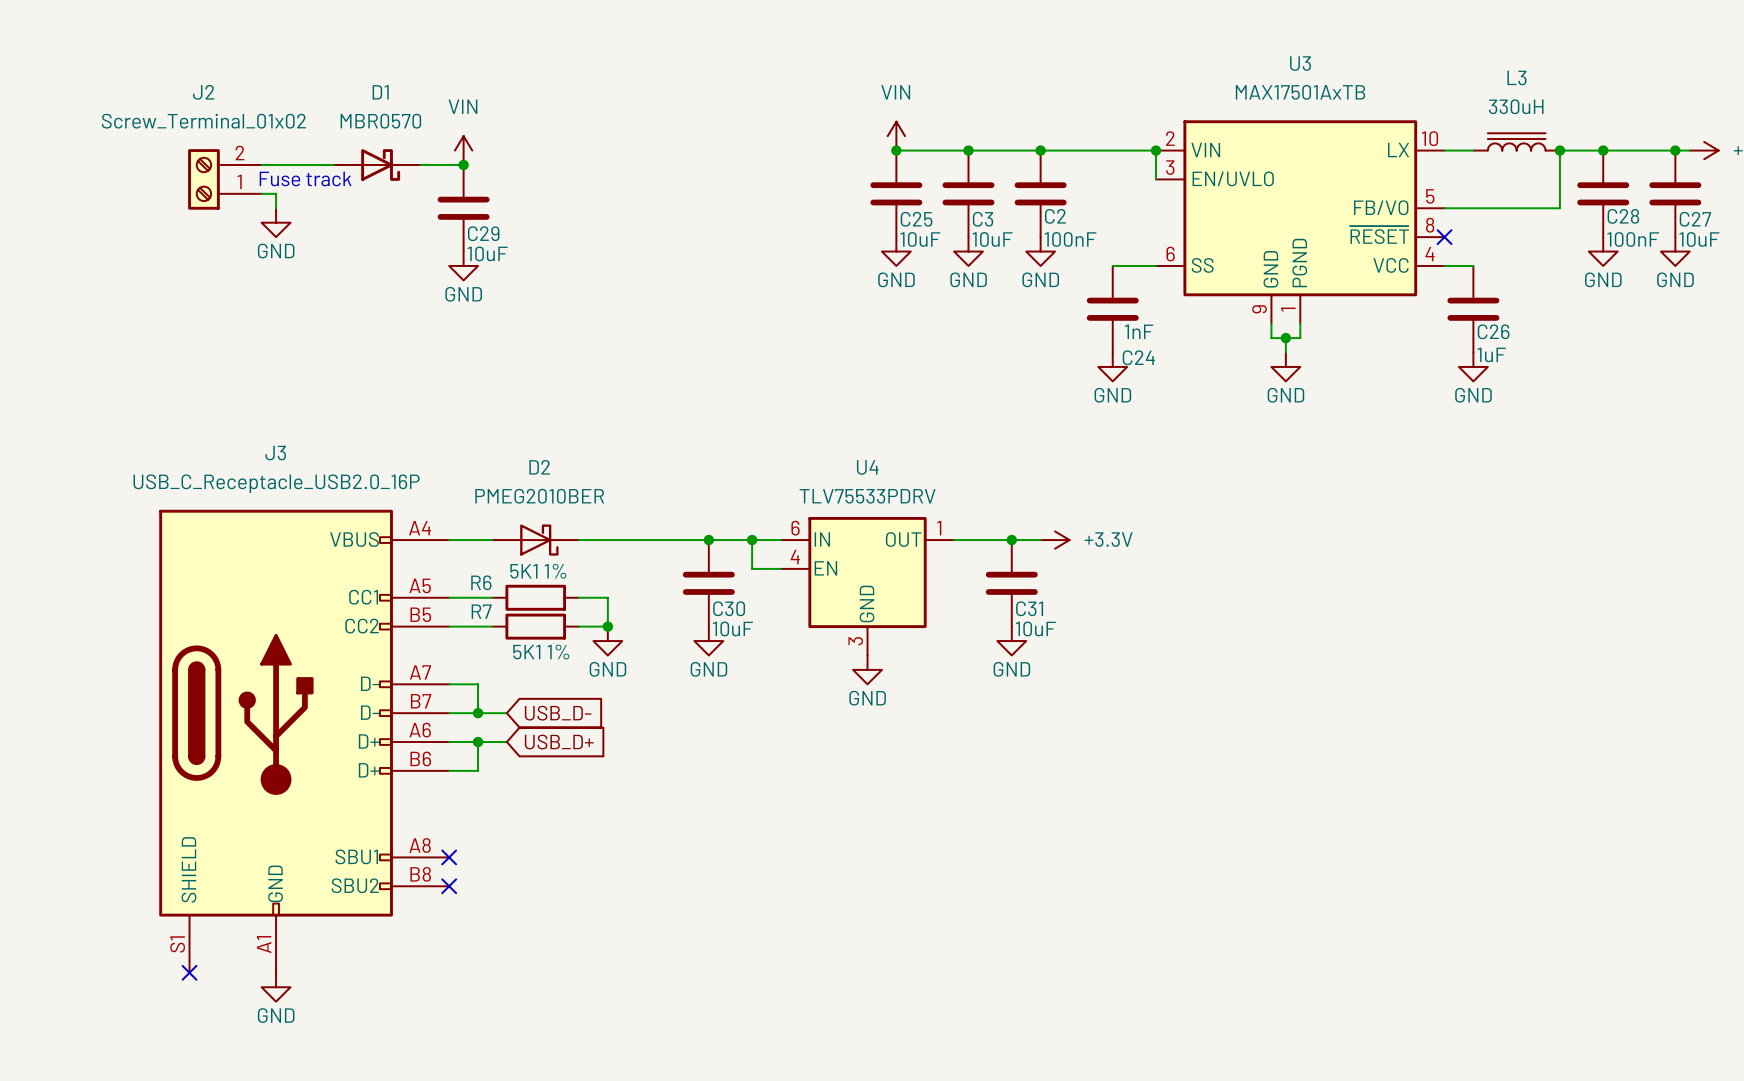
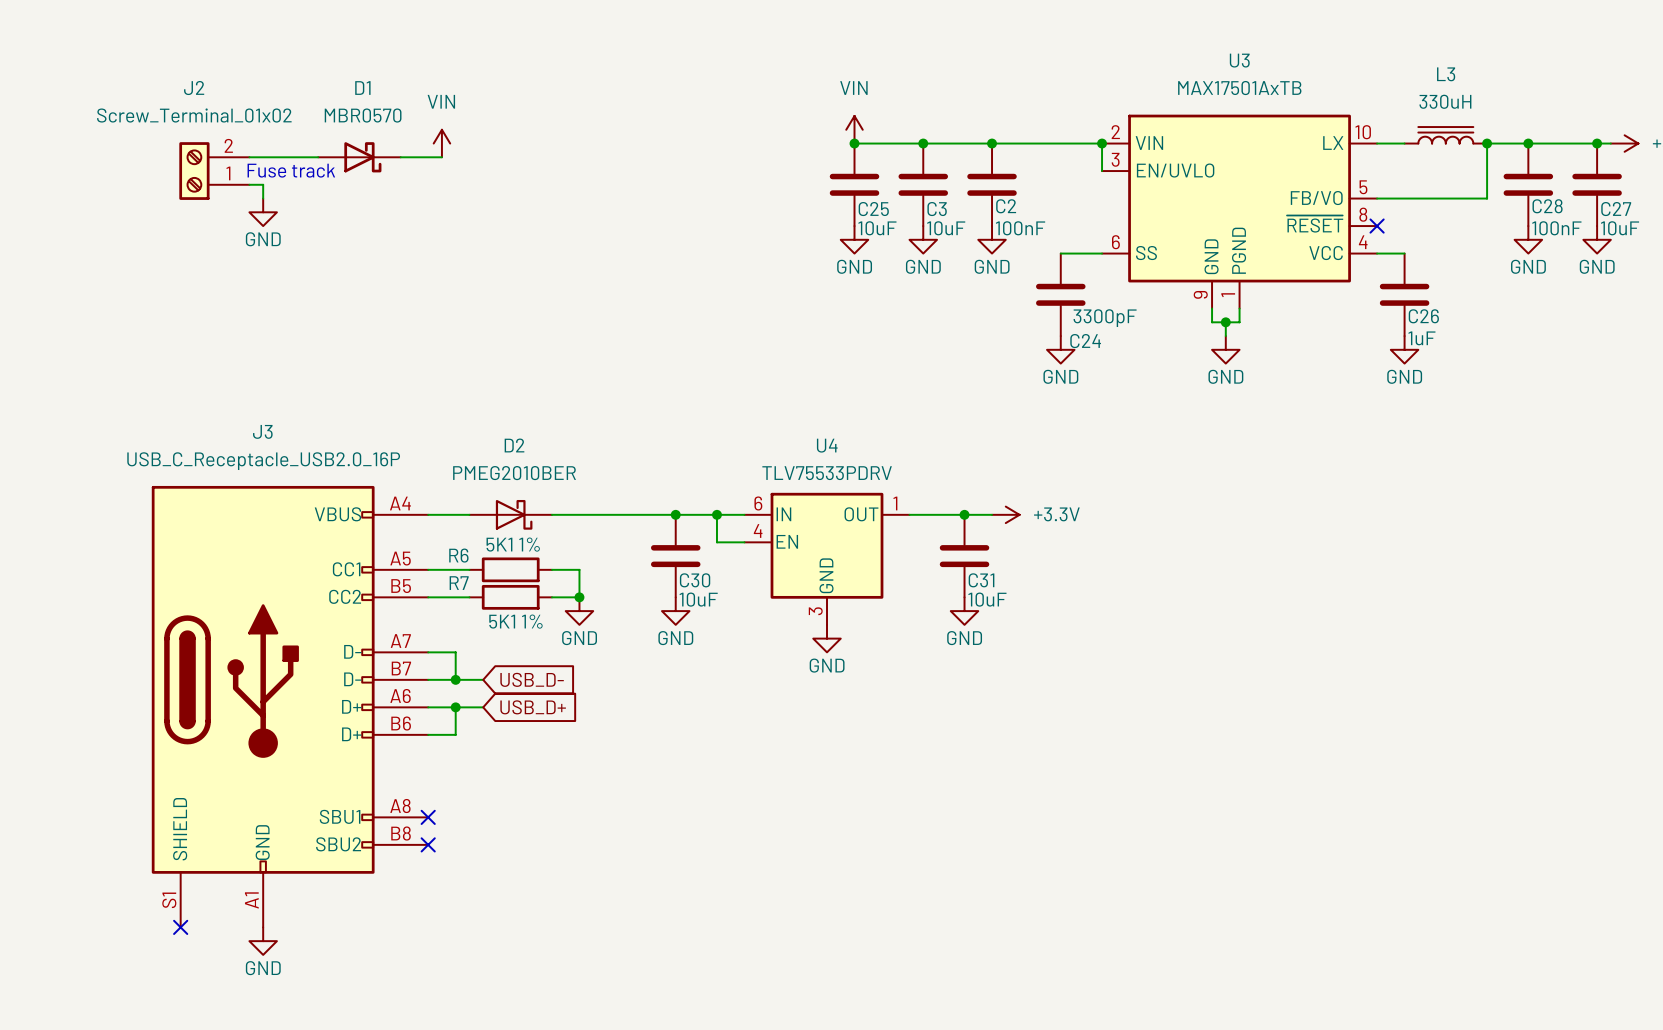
junction: (463, 164) -> none
C29: 10uF (463, 208) -> none
power symbol: GND (463, 265) -> none
C24 value: 1nF (1139, 331) -> 3300pF (1105, 318)

